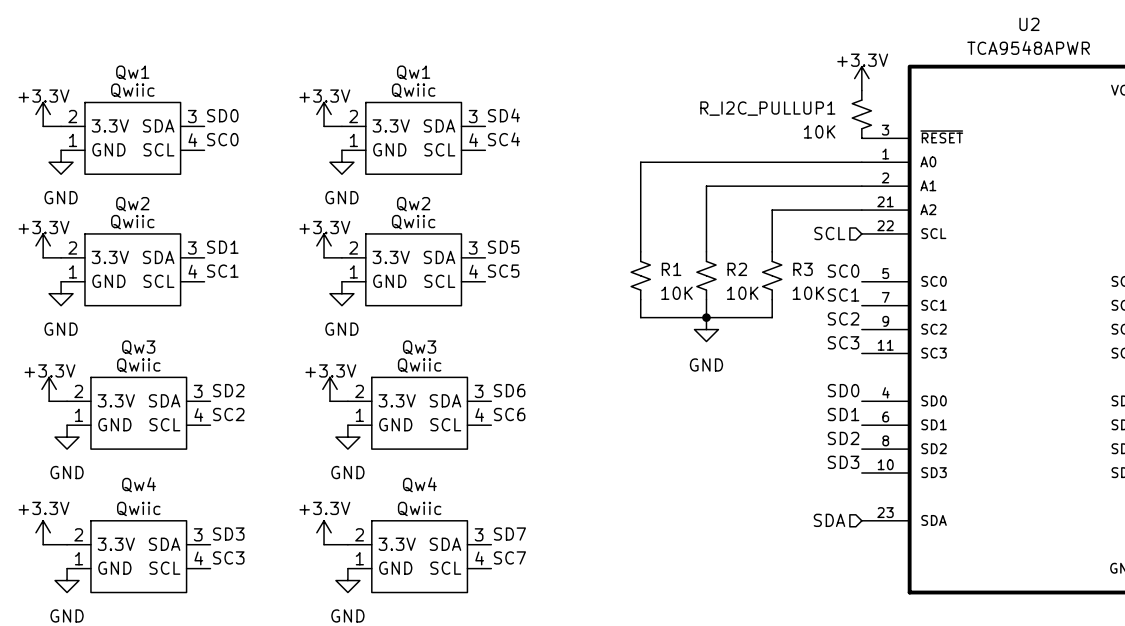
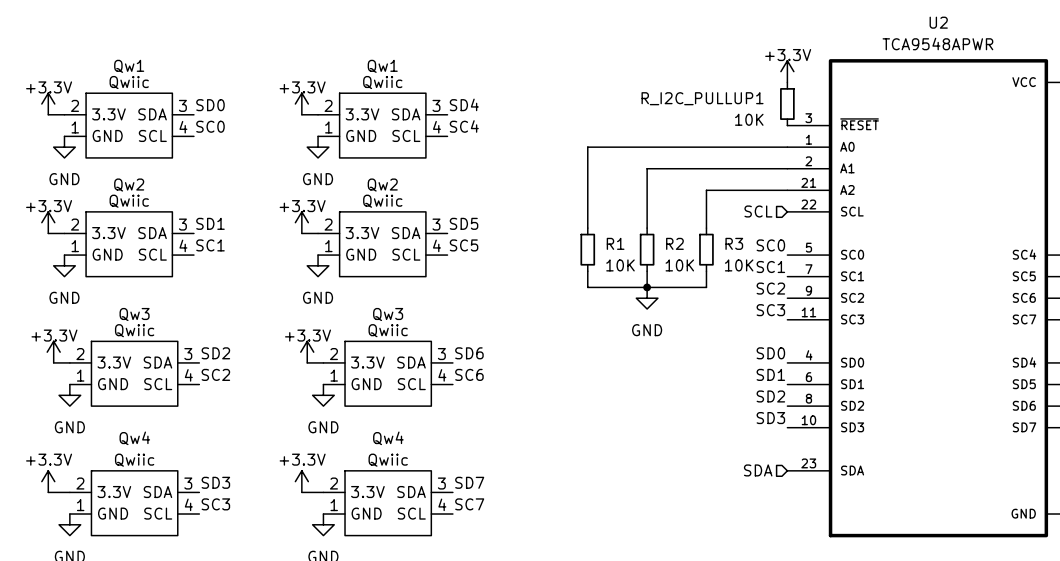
R_I2C_PULLUP1 symbol: [852, 90, 872, 139] -> [780, 82, 795, 126]
R1 symbol: [631, 251, 651, 300] -> [580, 228, 596, 272]
R2 symbol: [696, 251, 717, 300] -> [639, 228, 655, 272]
R3 symbol: [762, 251, 782, 300] -> [699, 228, 714, 272]

